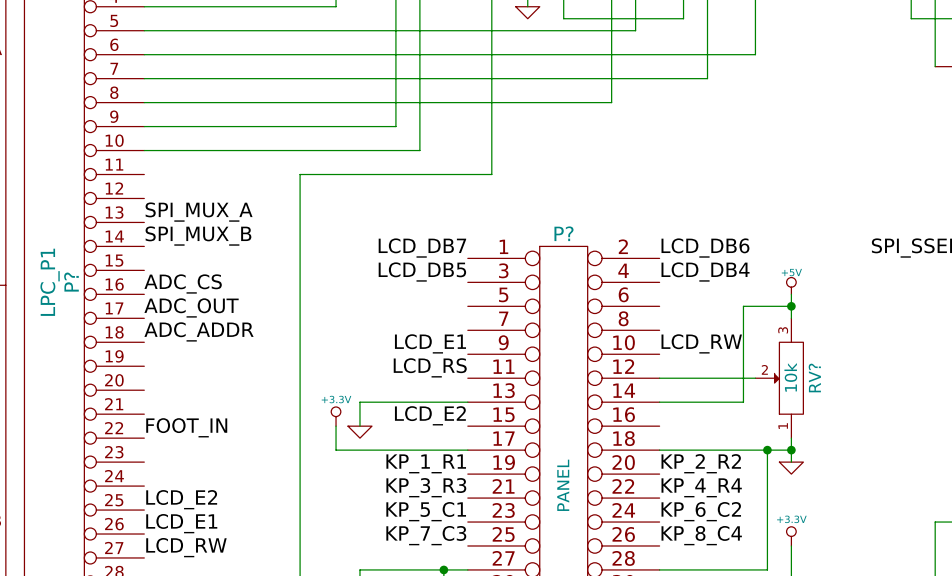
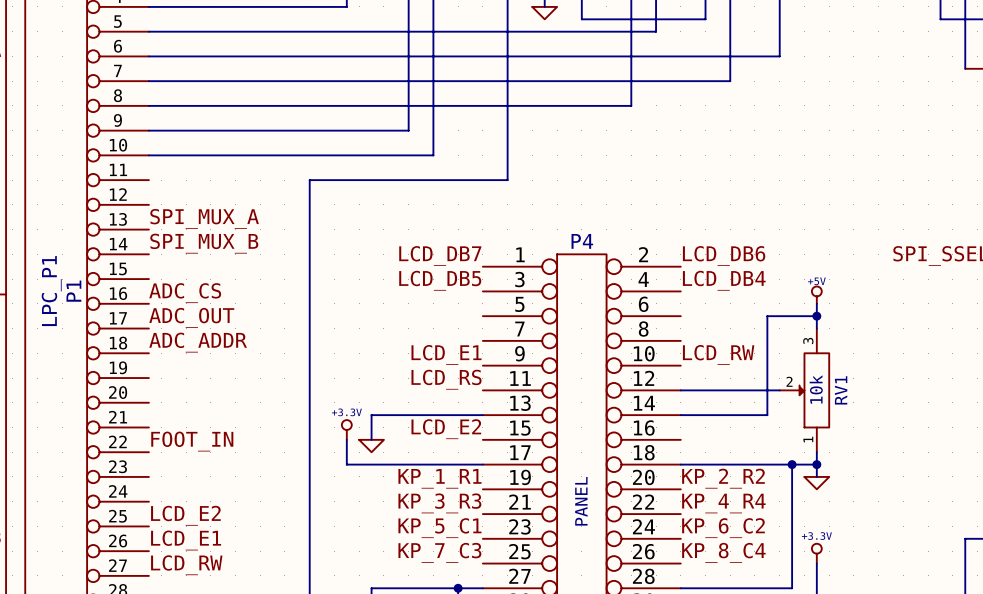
P? name: P? (563, 233) -> P4 (582, 241)
P? name: P? (71, 282) -> P1 (73, 291)
RV? name: RV? (814, 377) -> RV1 (841, 390)

